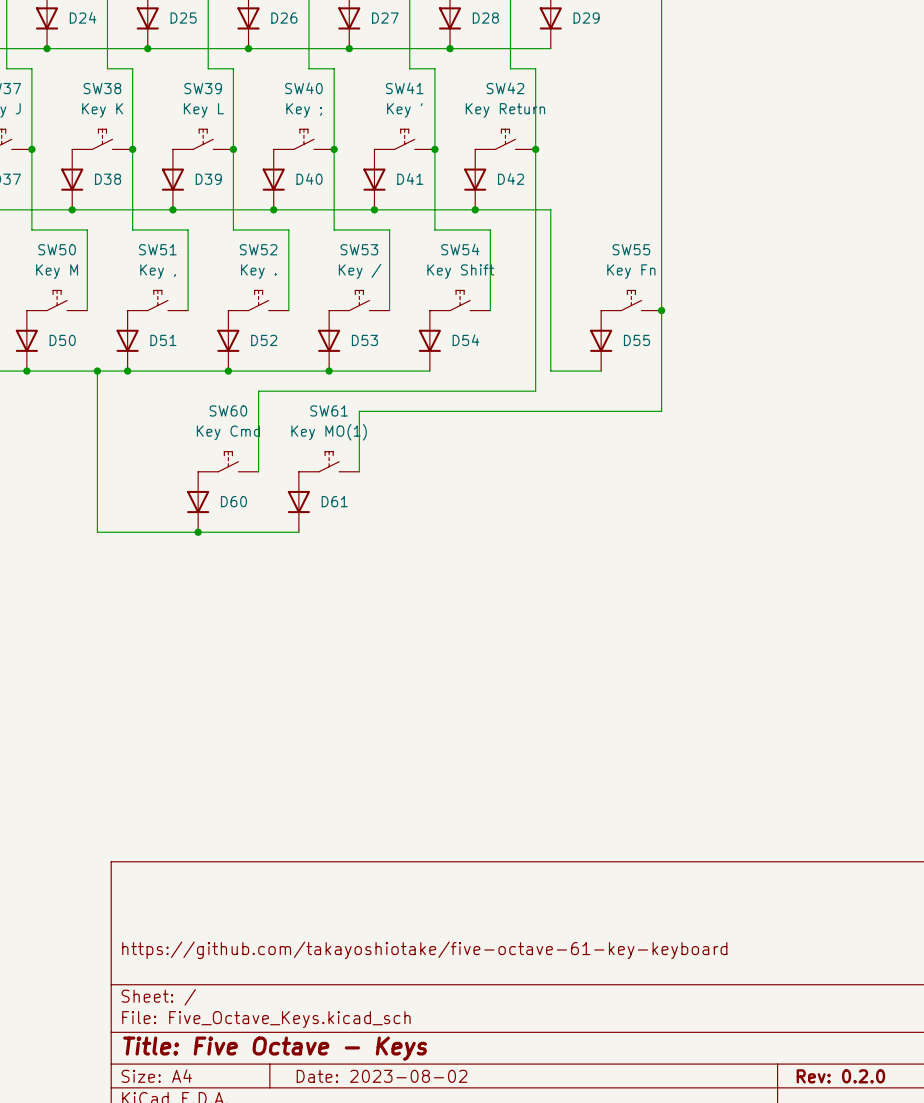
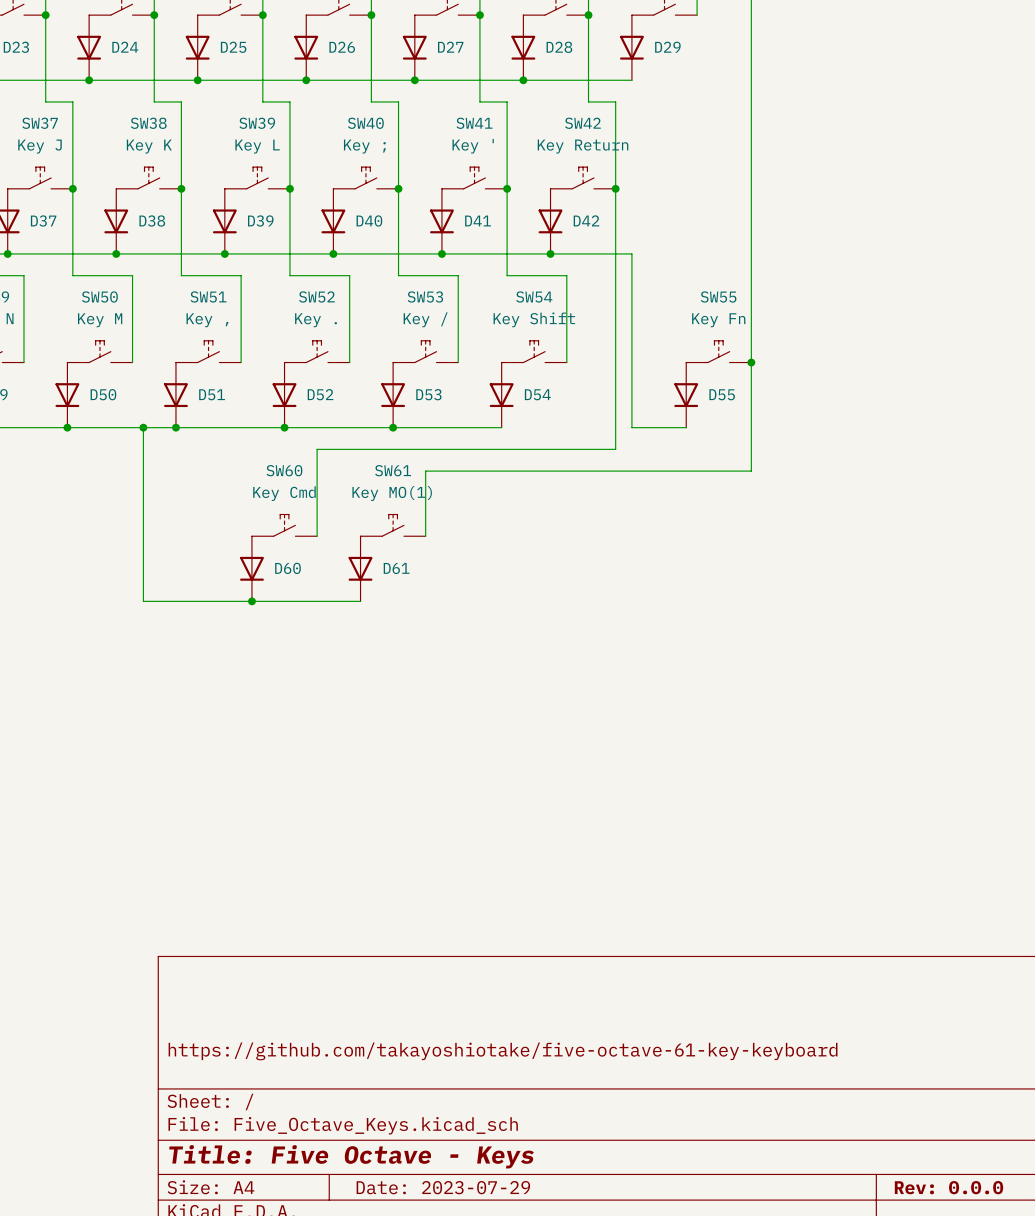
title block: Date: 2023-08-02 (382, 1076) -> Date: 2023-07-29 (443, 1187)
title block: Rev: 0.2.0 (840, 1076) -> Rev: 0.0.0 (949, 1187)

